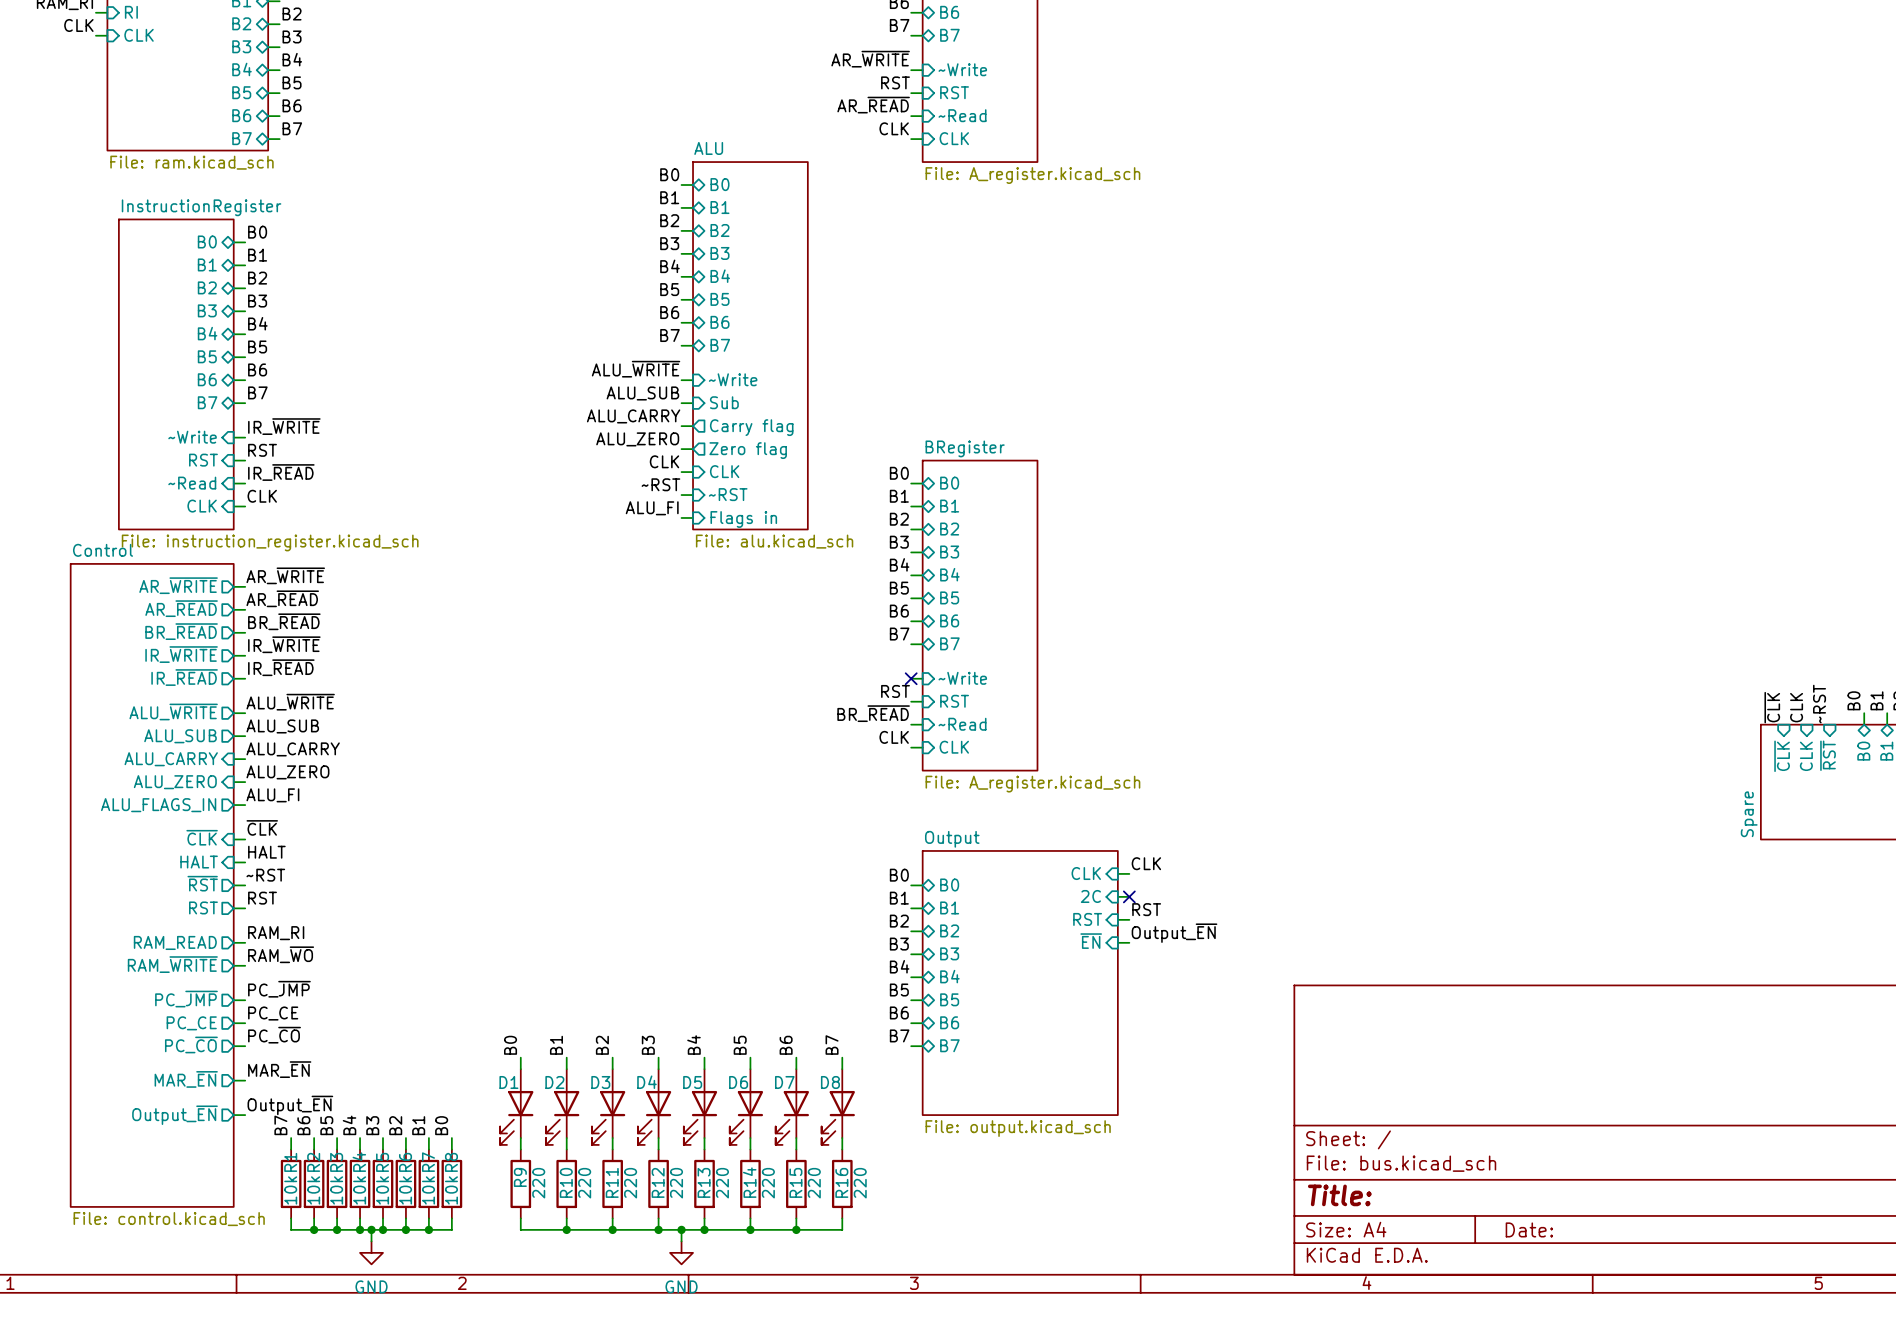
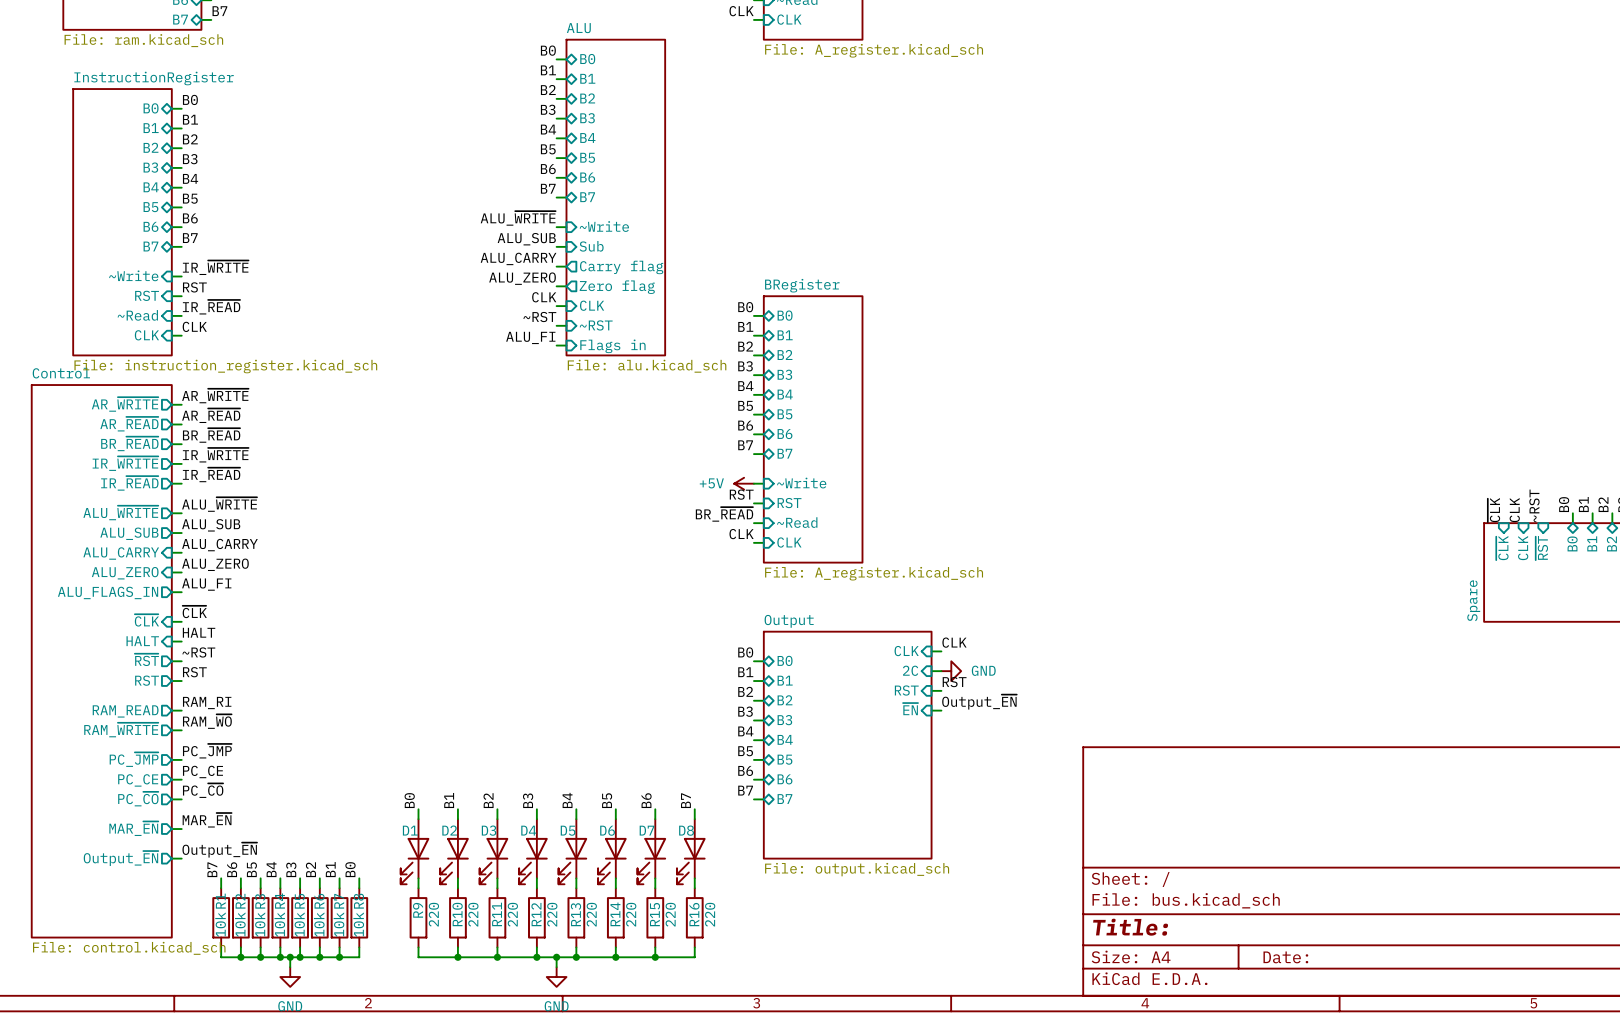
power symbol: none -> +5V (744, 483)
no-connect mark: (911, 678) -> none
no-connect mark: (1129, 896) -> none
power symbol: none -> GND (951, 671)

